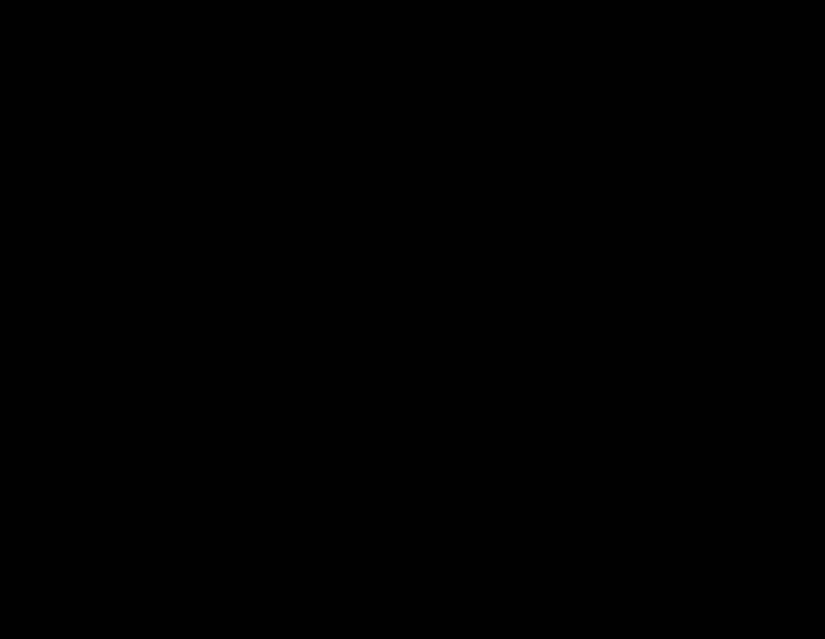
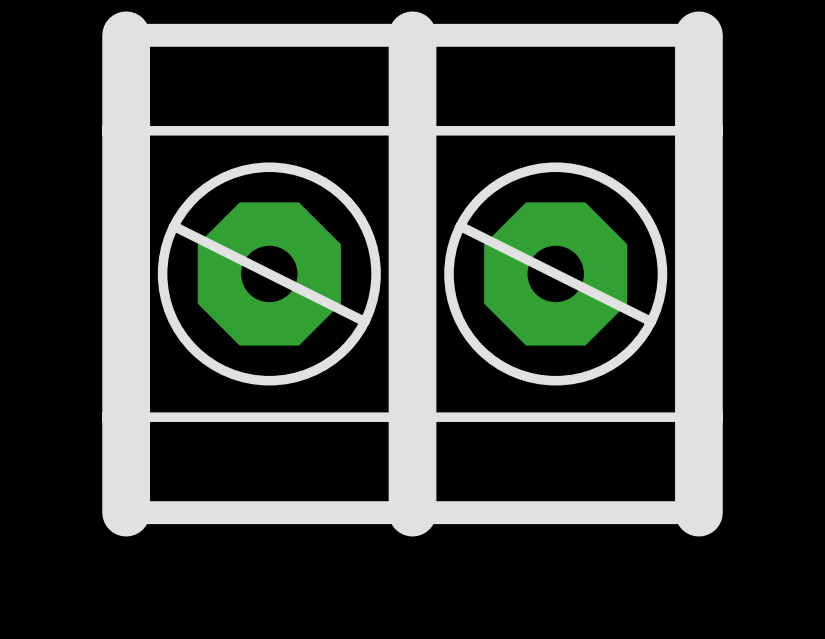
part: none -> (412, 273)

